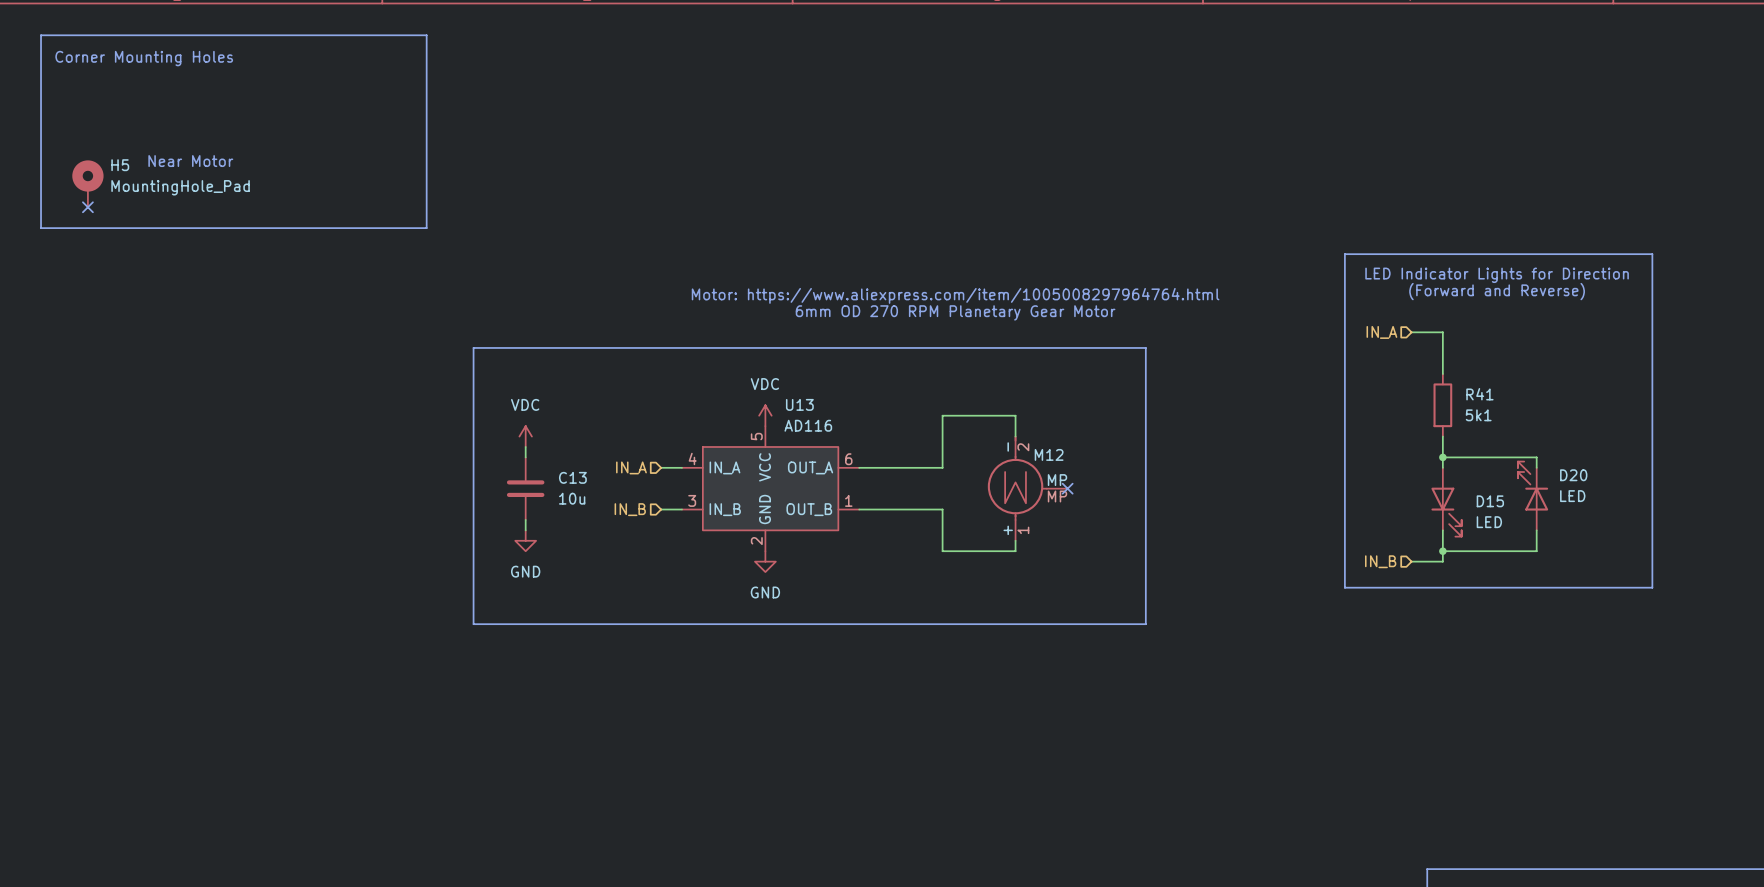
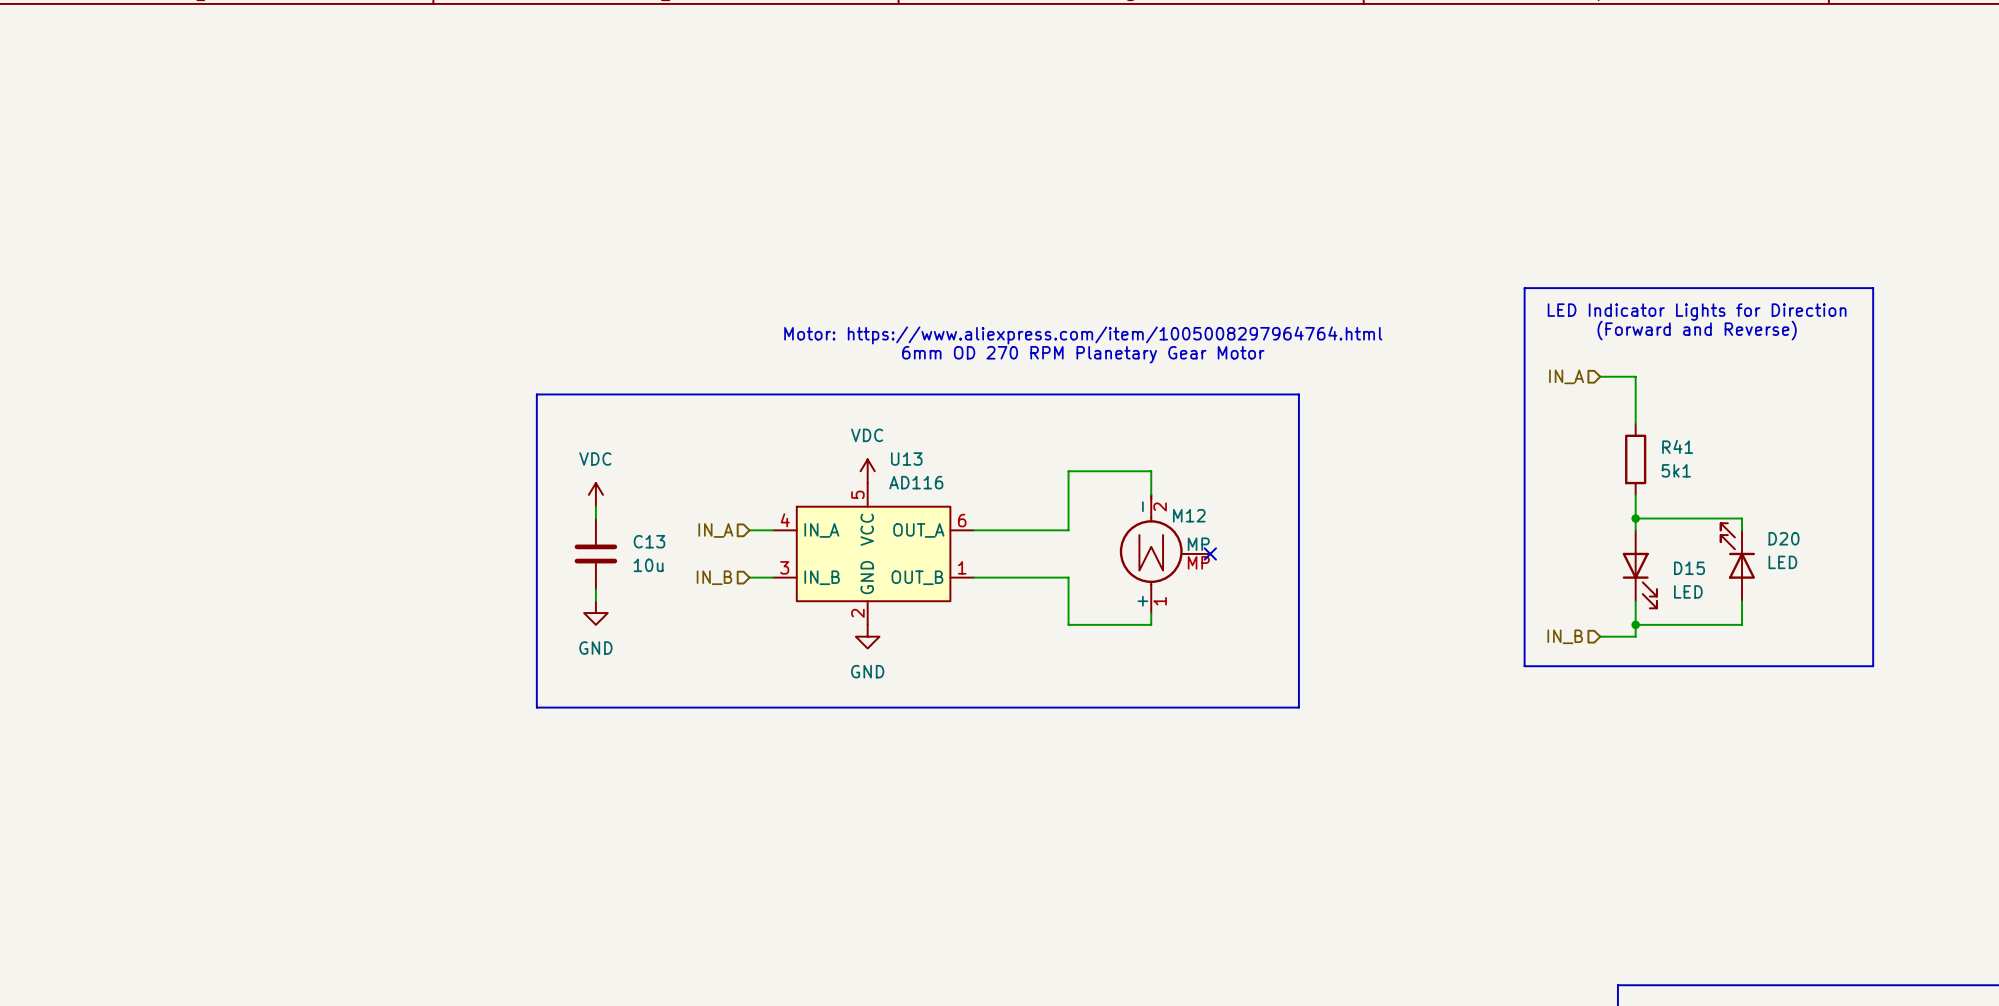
line: (41, 35) (426, 35) (426, 228) (41, 228) (41, 35) -> none
text: Corner Mounting Holes (144, 58) -> none
text: Near Motor (190, 161) -> none
H5: MountingHole_Pad (87, 183) -> none
no-connect mark: (87, 207) -> none

